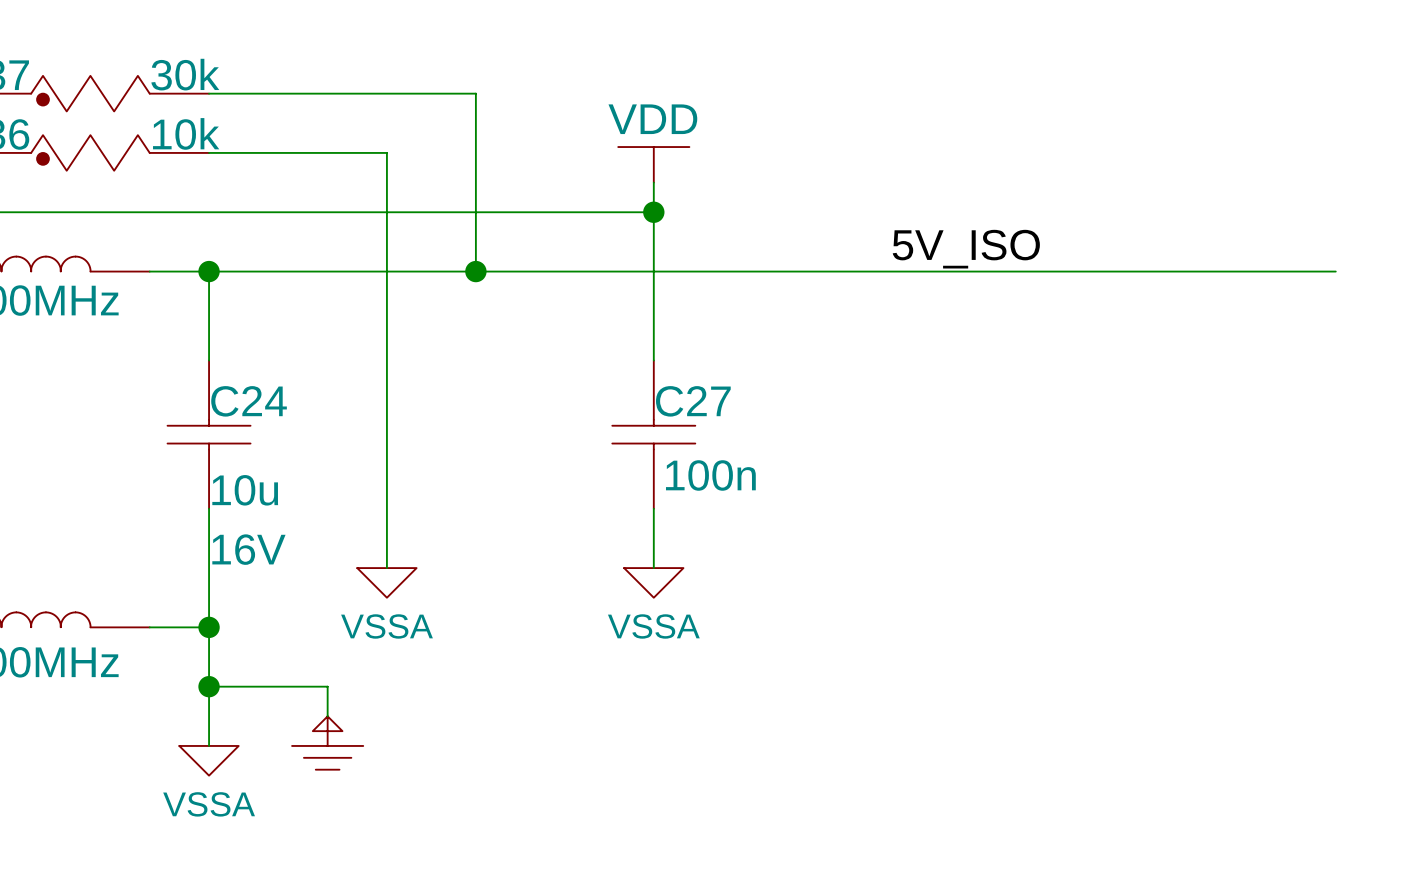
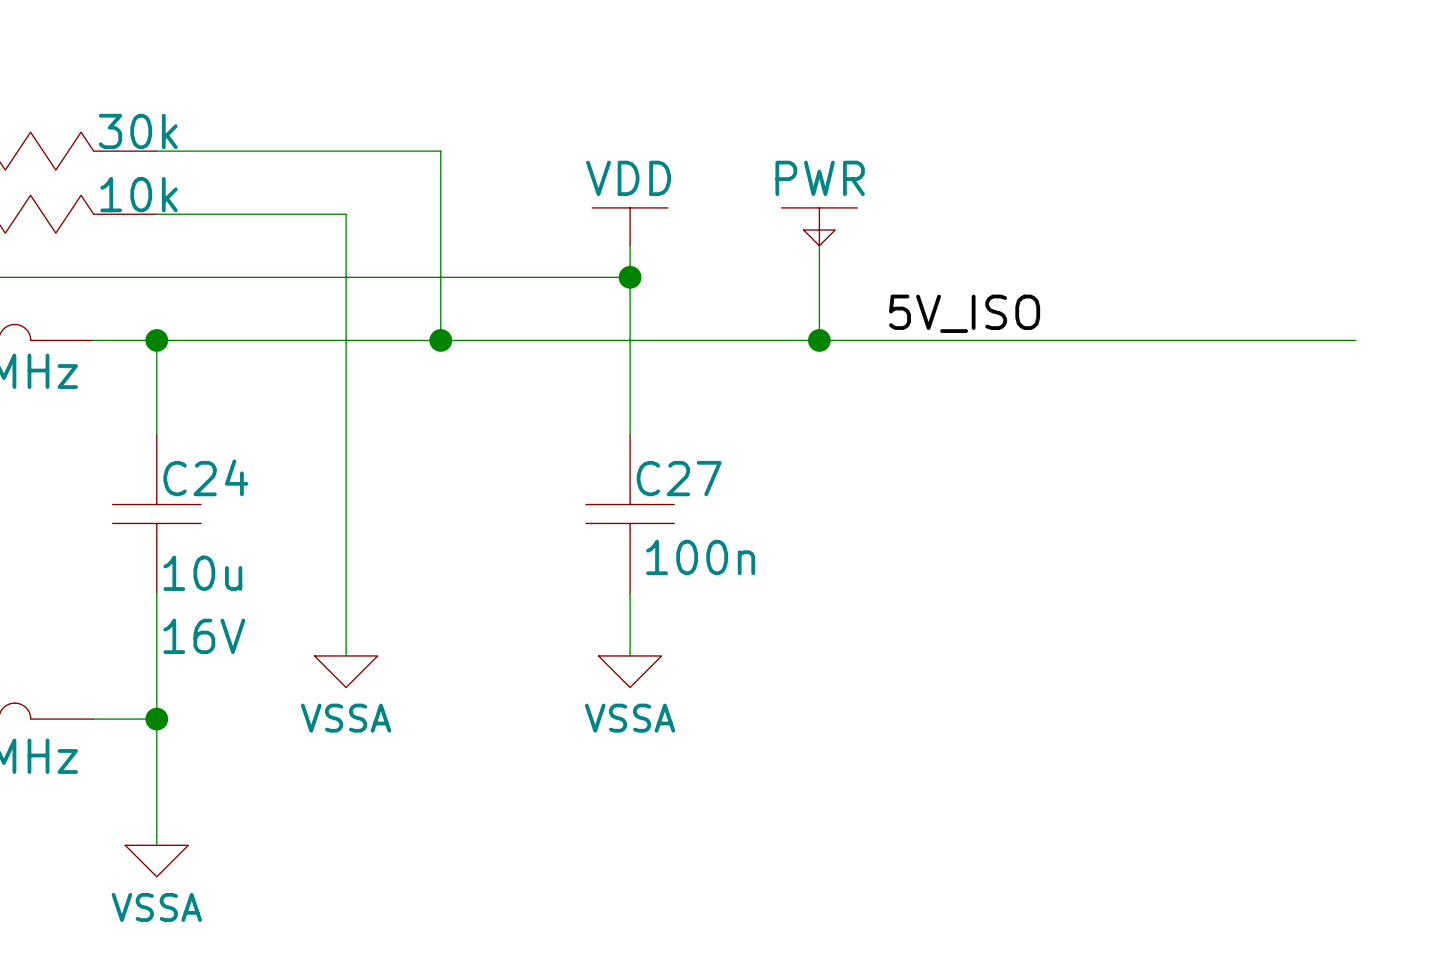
power symbol: none -> PWR (819, 226)
wire: none -> (819, 245) (819, 340)
junction: none -> (819, 340)
wire: (209, 686) (327, 686) (327, 716) -> none
junction: (209, 686) -> none
power symbol: (327, 743) -> none

